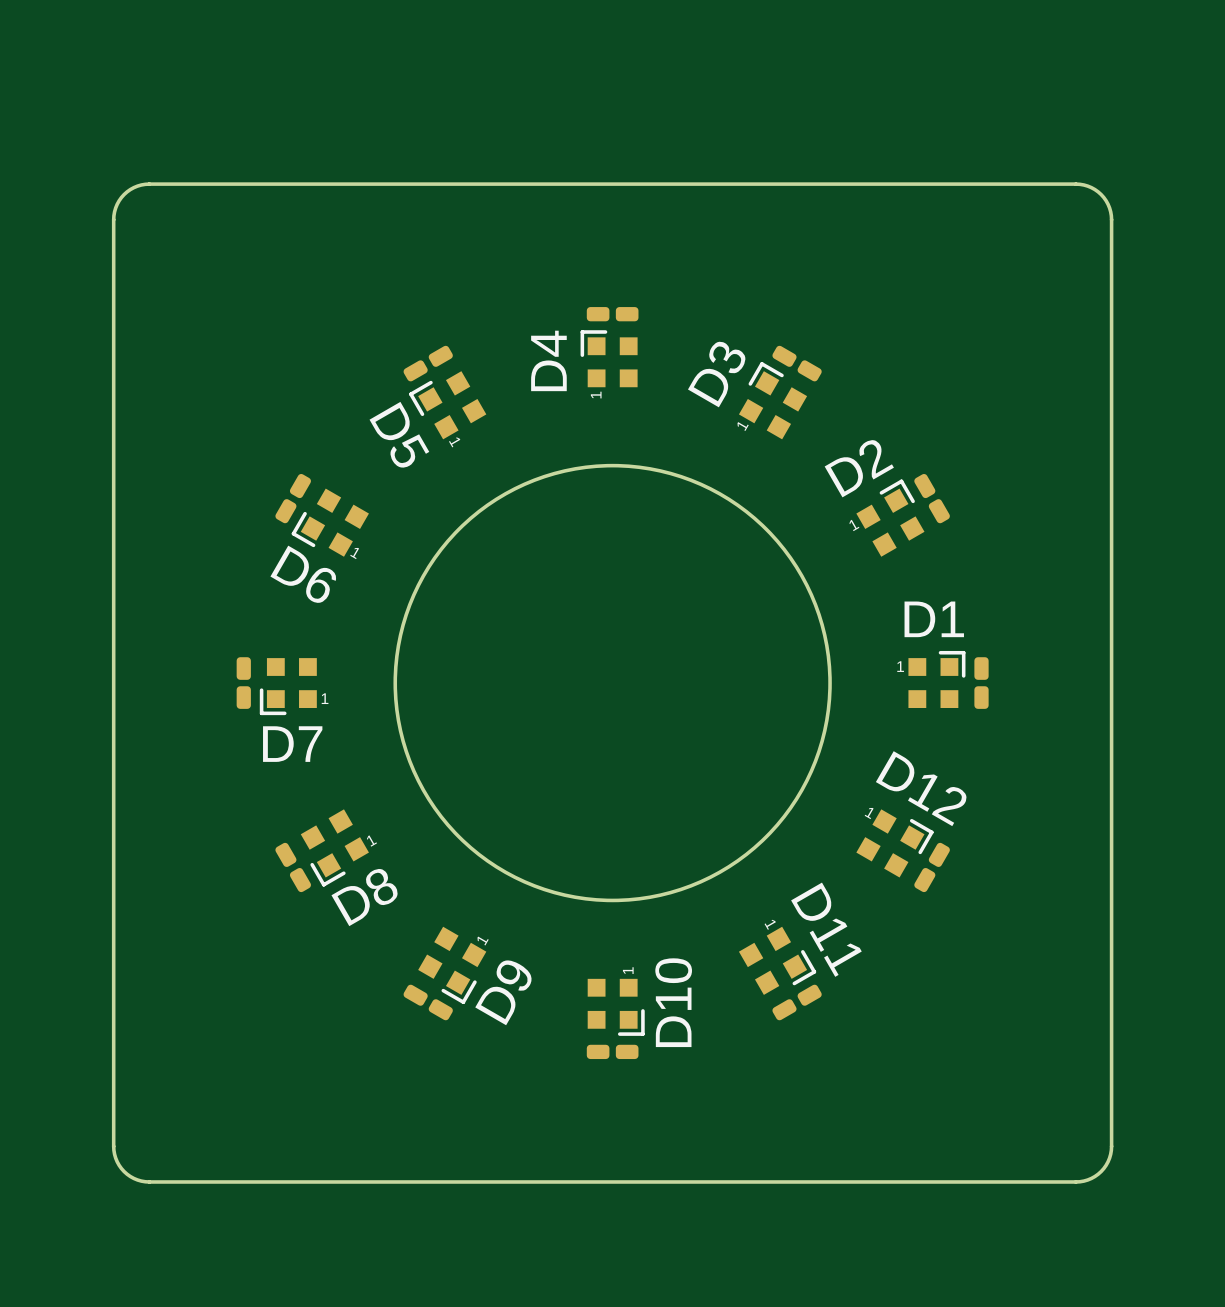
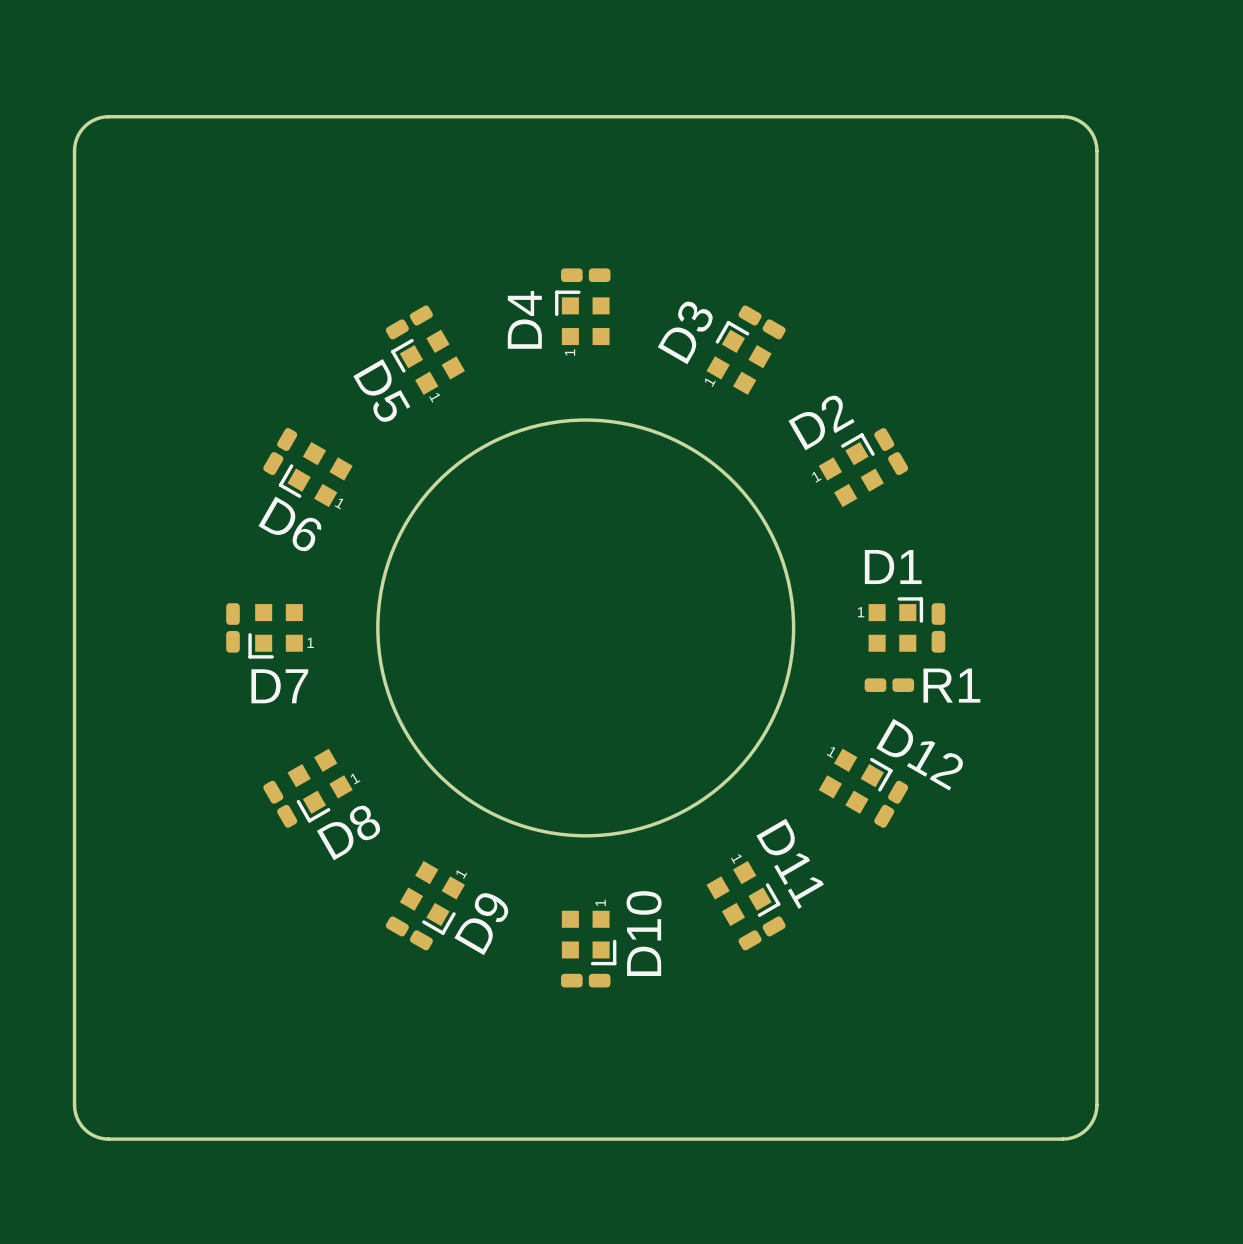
board edge: (149, 184) (1075, 184) (1091, 187) (1101, 194) (1109, 207) (1111, 219) (1111, 1146) (1109, 1158) (1101, 1171) (1087, 1179) (1075, 1181) (149, 1181) (133, 1178) (124, 1171) (117, 1161) (113, 1146) (113, 219) (115, 207) (124, 194) (137, 186) (149, 184) -> (108, 116) (95, 119) (84, 126) (77, 137) (74, 150) (74, 1105) (77, 1118) (84, 1129) (95, 1136) (108, 1139) (1062, 1139) (1075, 1136) (1086, 1129) (1094, 1118) (1096, 1105) (1096, 150) (1094, 137) (1086, 126) (1075, 119) (1062, 116) (108, 116)
R1: none -> (889, 685)
D12 name position: D12 (921, 788) -> D12 (920, 754)

